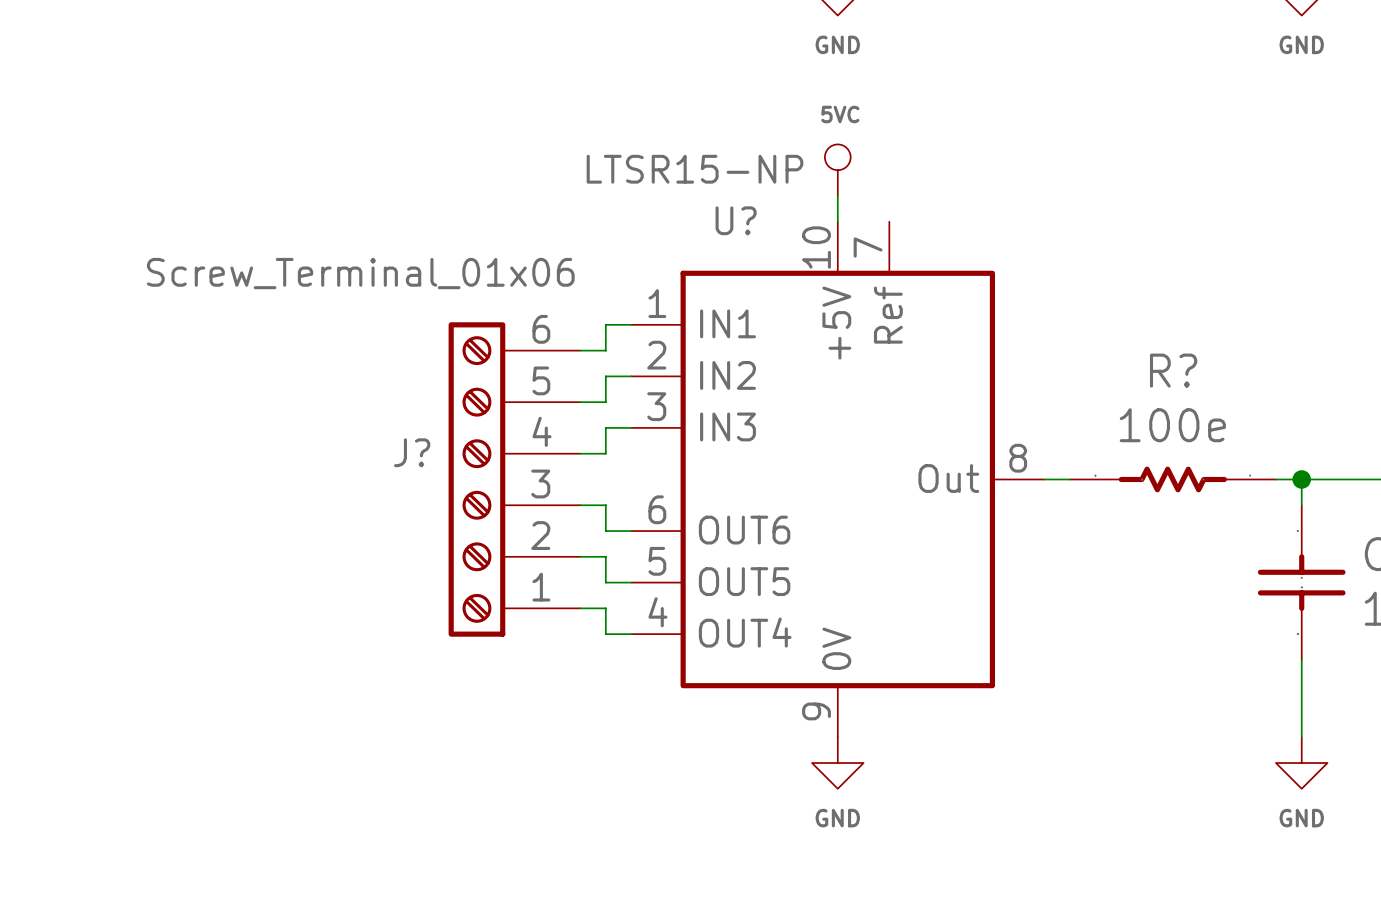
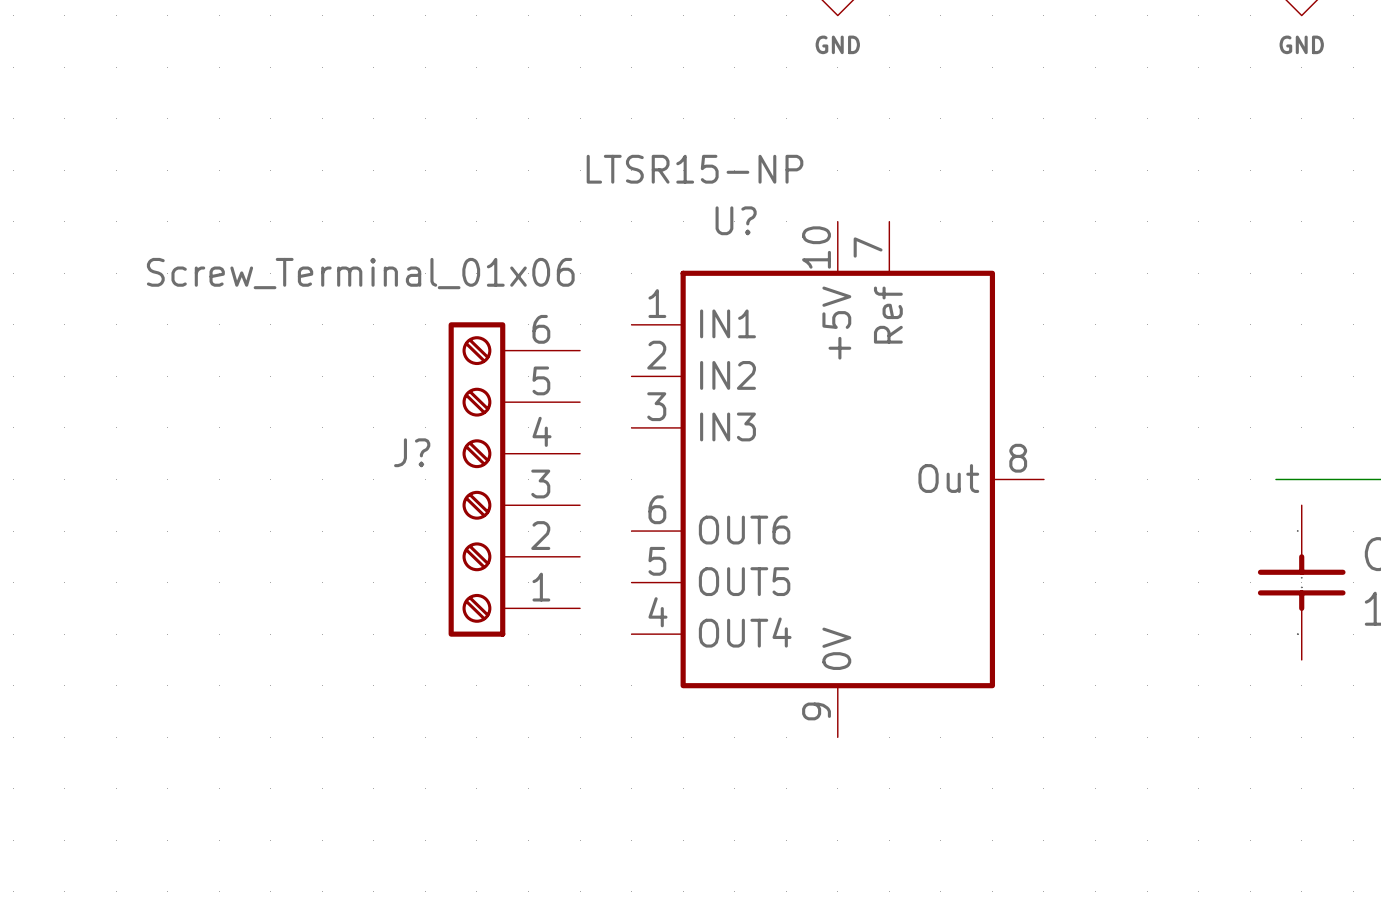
power symbol: 5VC (837, 170) -> none
wire: (837, 195) (837, 221) -> none
wire: (631, 324) (605, 324) (605, 350) (580, 350) -> none
wire: (631, 376) (605, 376) (605, 402) (580, 402) -> none
wire: (631, 427) (605, 427) (605, 453) (580, 453) -> none
wire: (1043, 479) (1069, 479) -> none
R?: 100e (1172, 479) -> none
wire: (1301, 479) (1301, 505) -> none
junction: (1301, 479) -> none
wire: (580, 505) (605, 505) (605, 531) (631, 531) -> none
wire: (580, 556) (605, 556) (605, 582) (631, 582) -> none
wire: (580, 608) (605, 608) (605, 634) (631, 634) -> none
wire: (1301, 659) (1301, 737) -> none
power symbol: GND (837, 763) -> none
power symbol: GND (1301, 763) -> none

